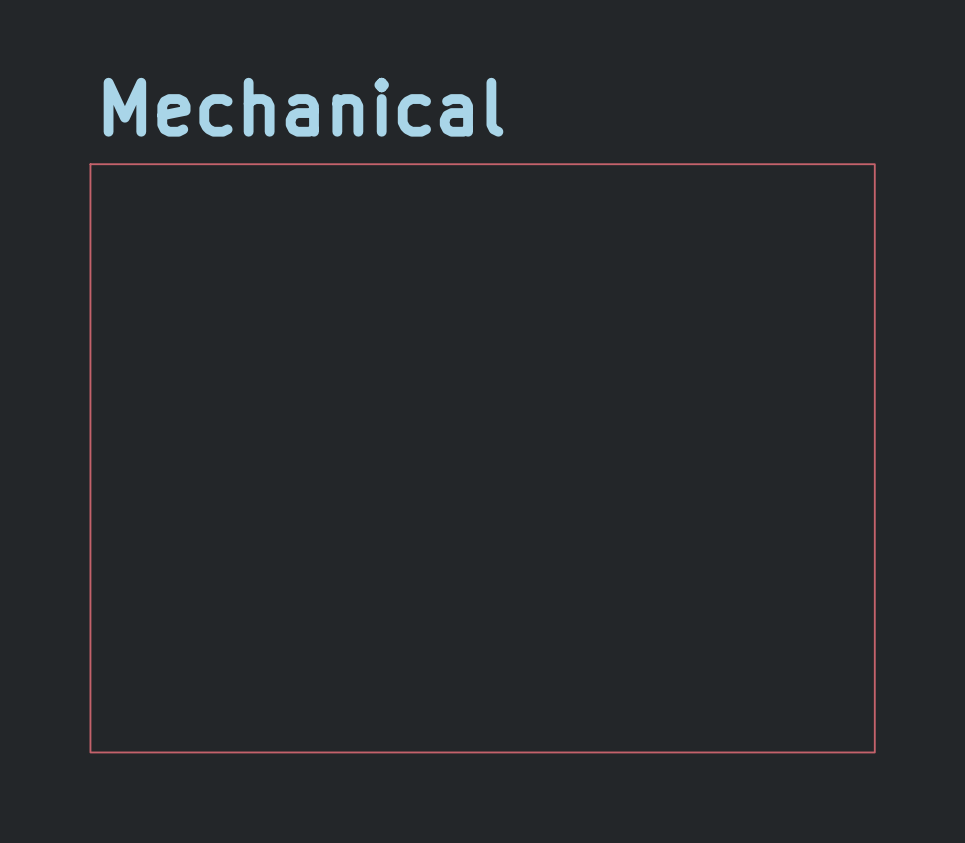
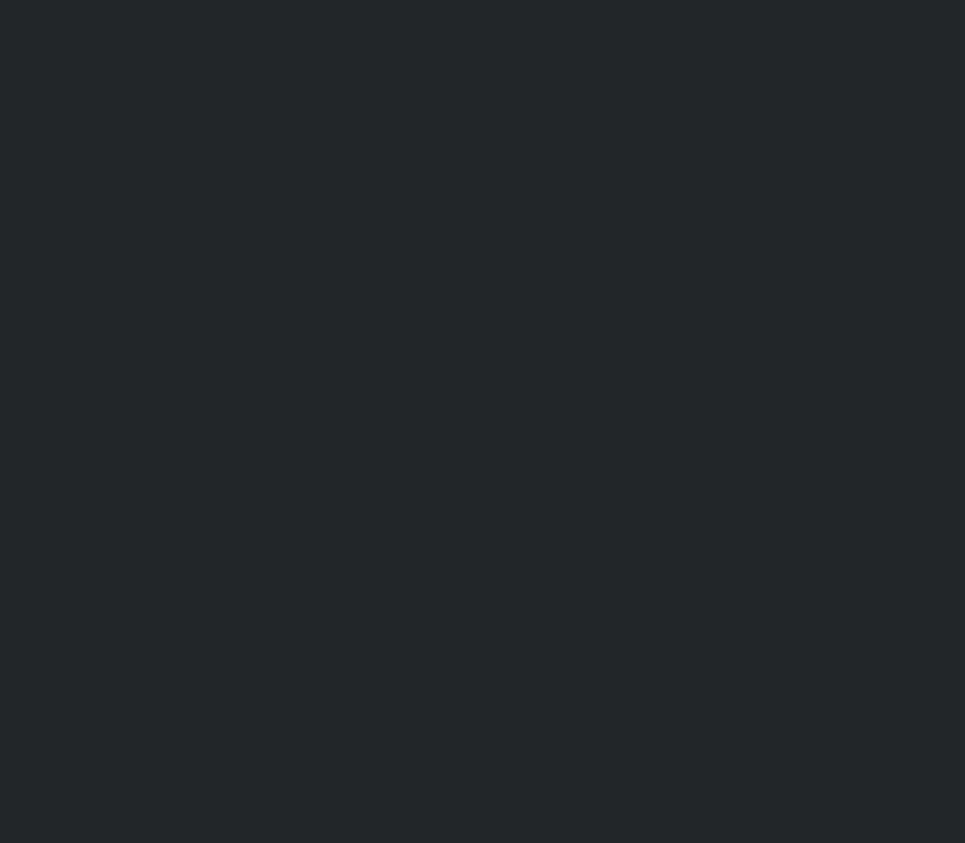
sheet Mechanical: (482, 458) -> none

